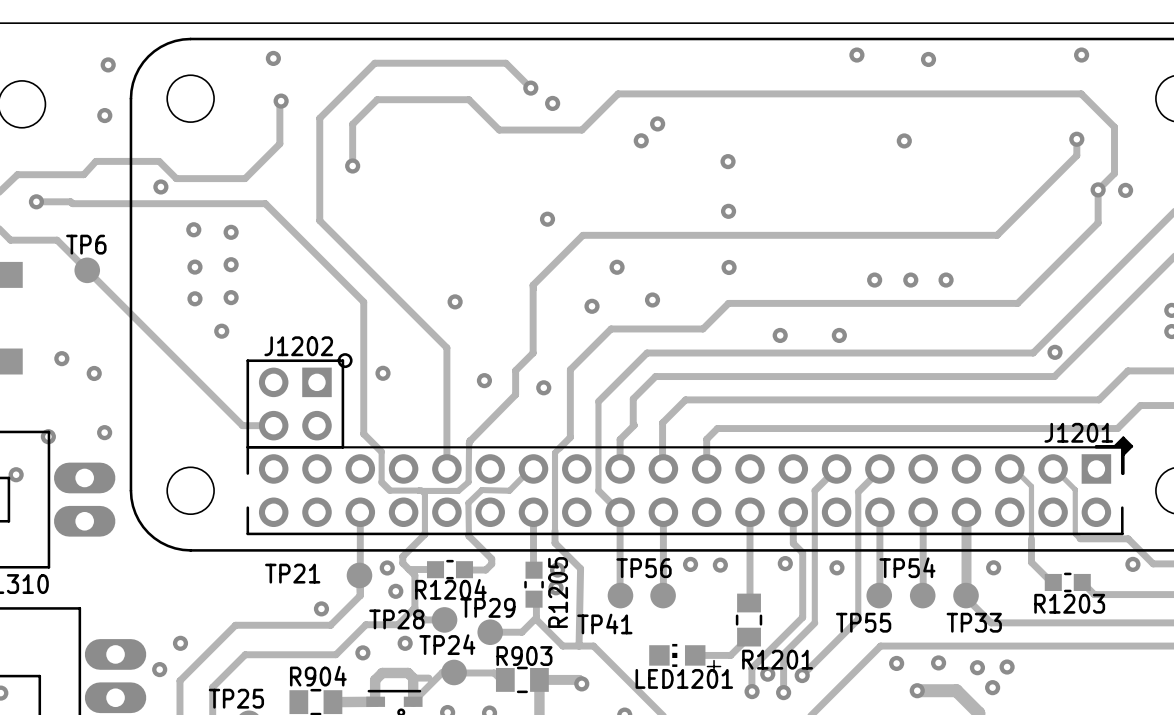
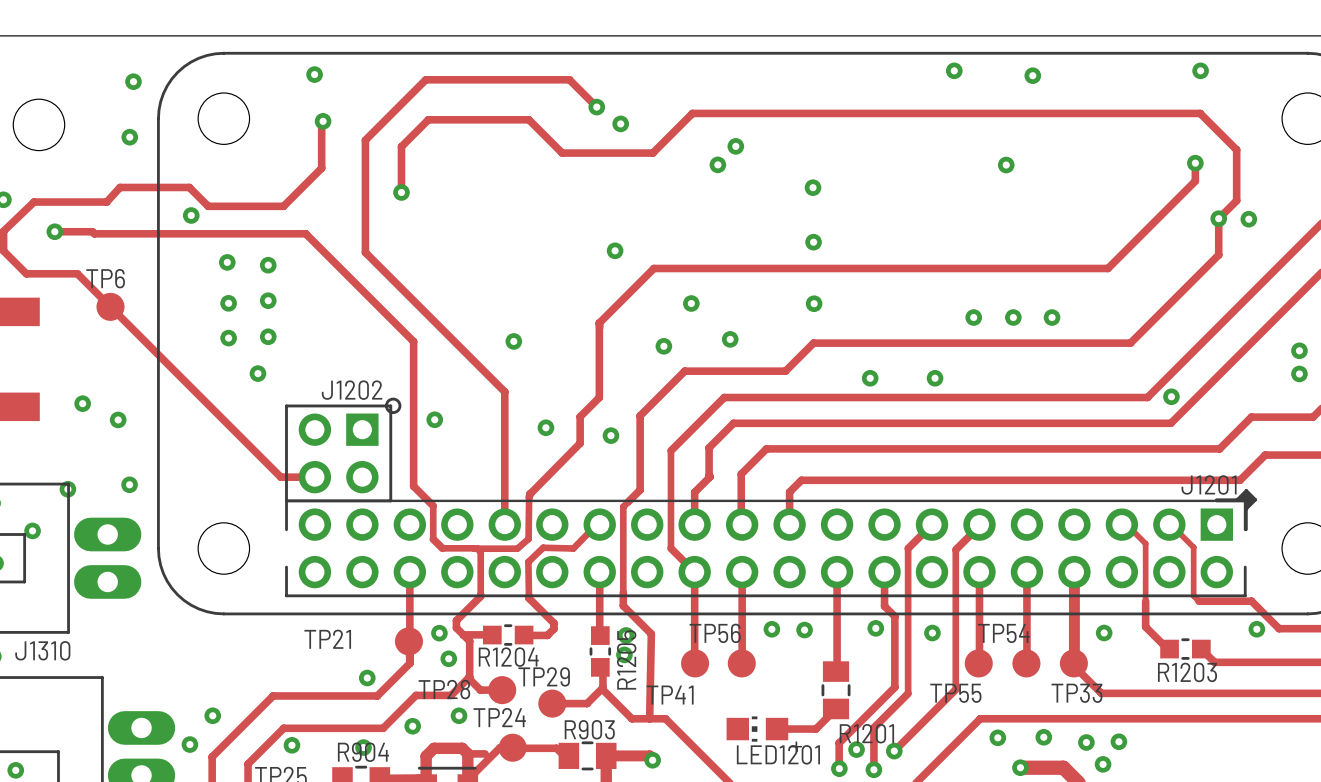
via: none -> (291, 745)
via: none -> (363, 747)

